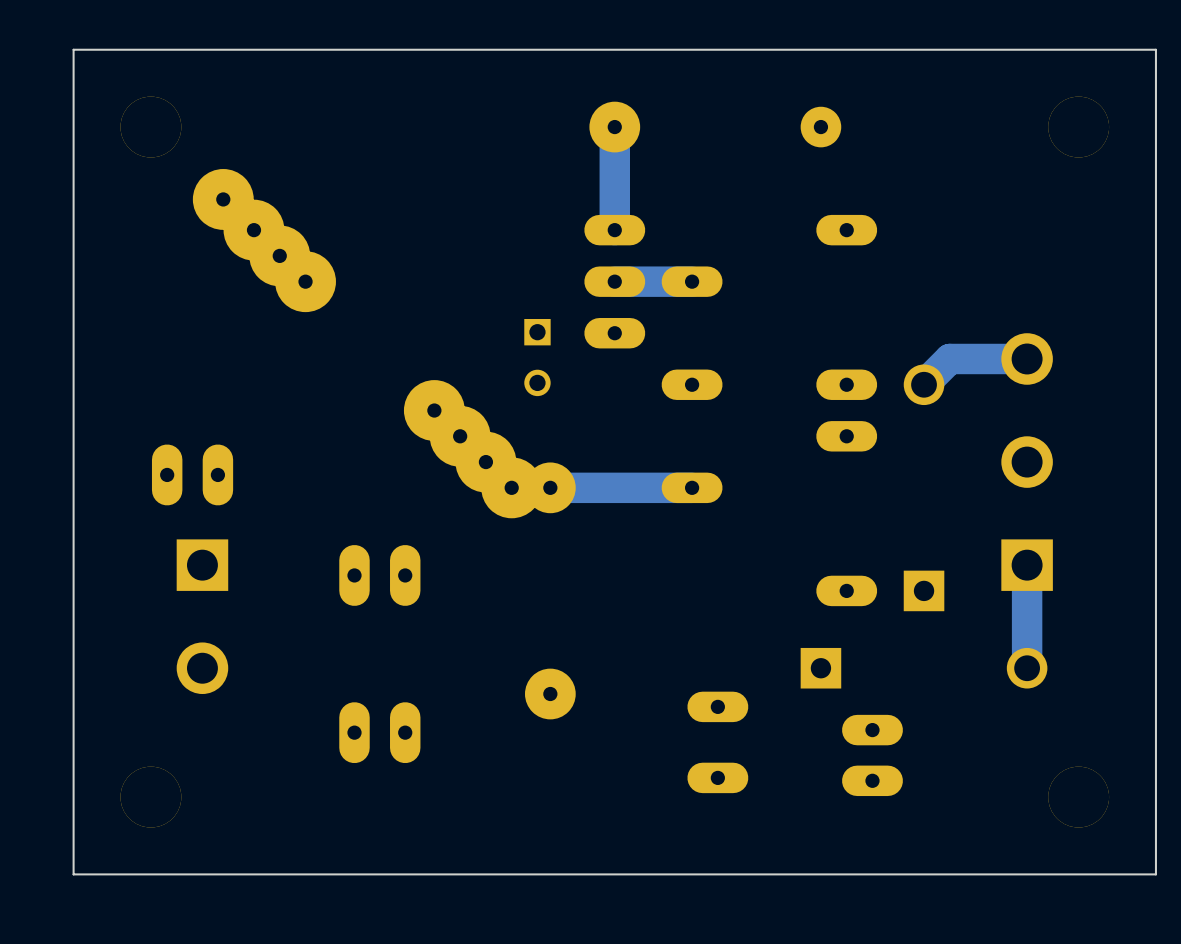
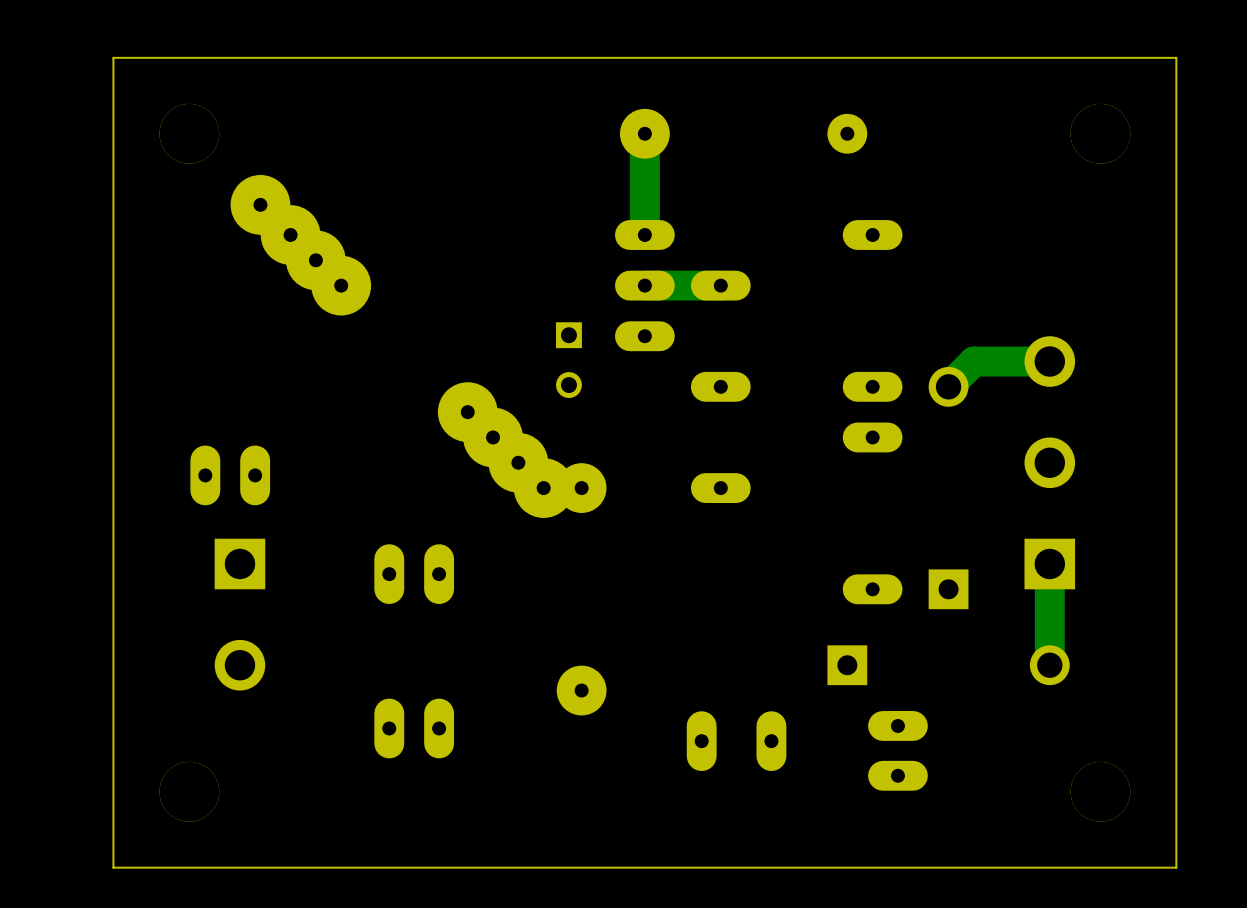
bottom track: (692, 487) (550, 487) -> none
part rotation: 0° (717, 742) -> 90° clockwise (736, 741)

